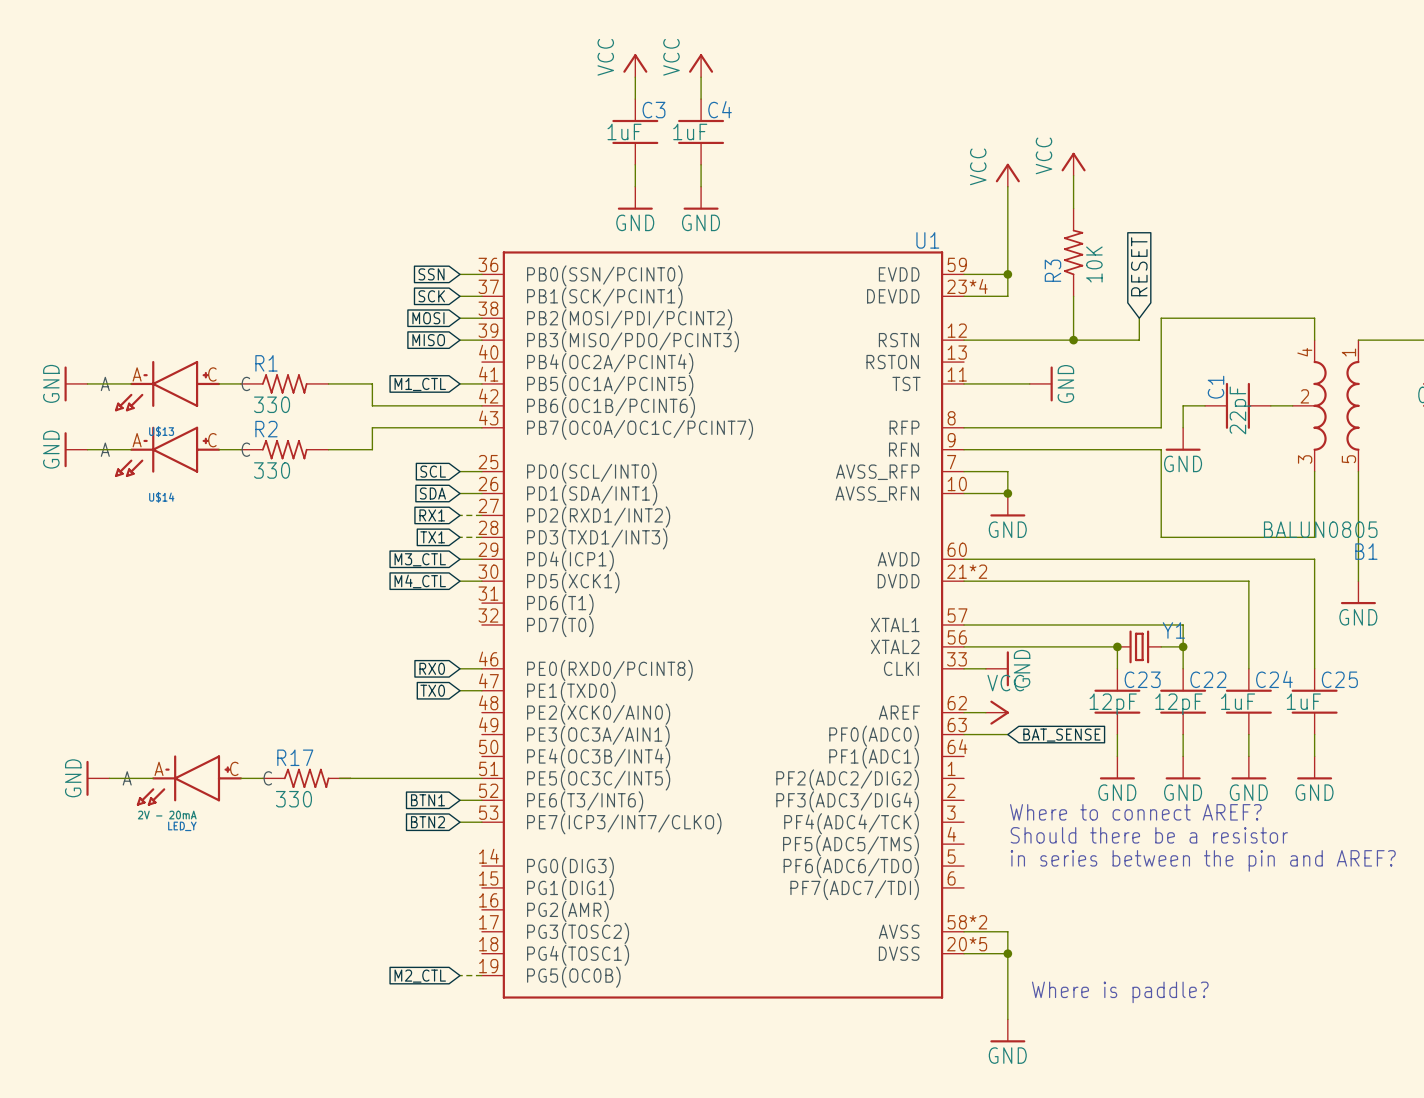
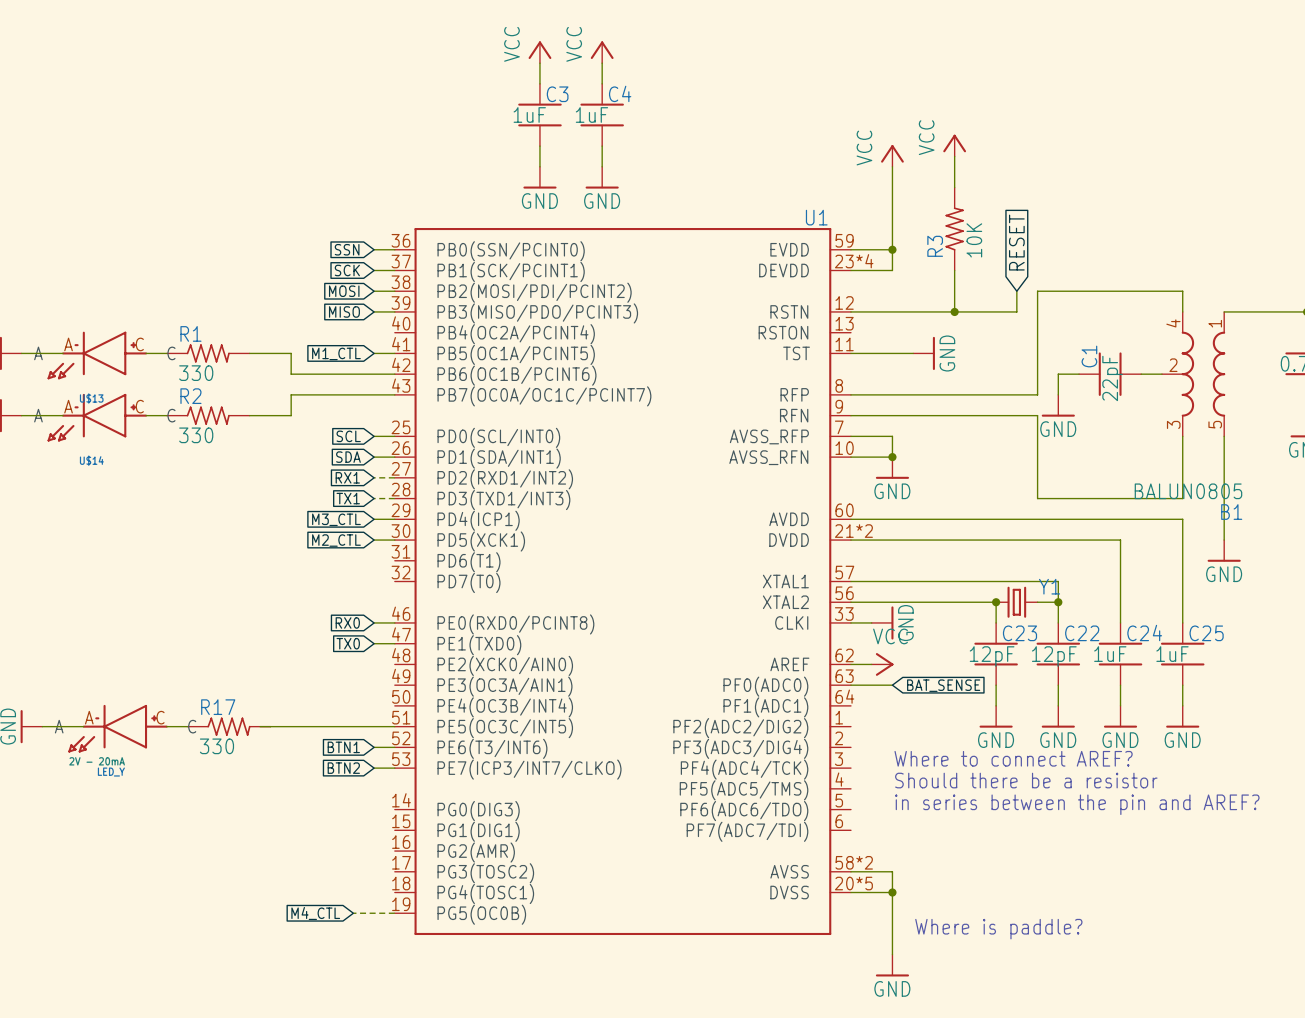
global label: M4_CTL (420, 581) -> M2_CTL (336, 540)
wire: none -> (353, 913) (374, 913)
global label: M2_CTL (420, 976) -> M4_CTL (315, 913)

